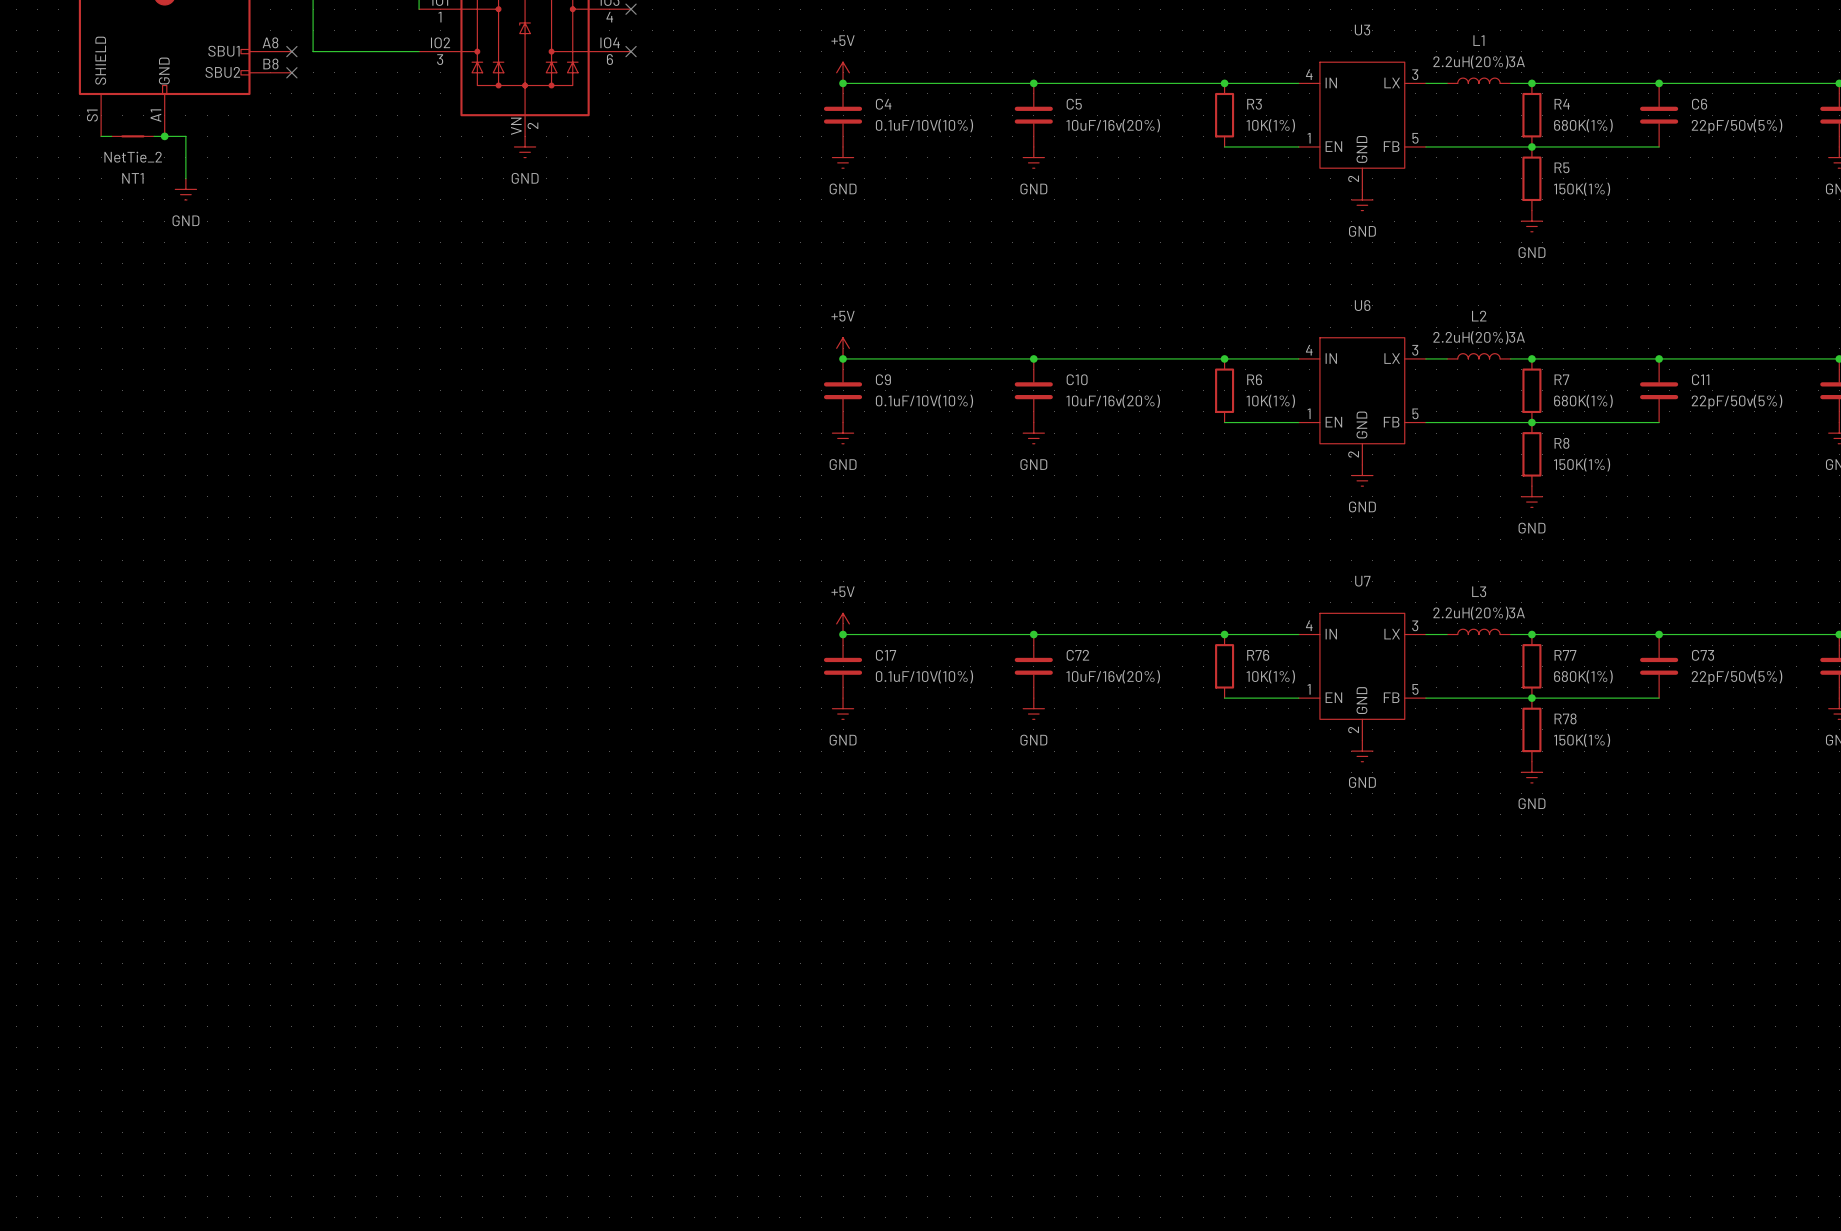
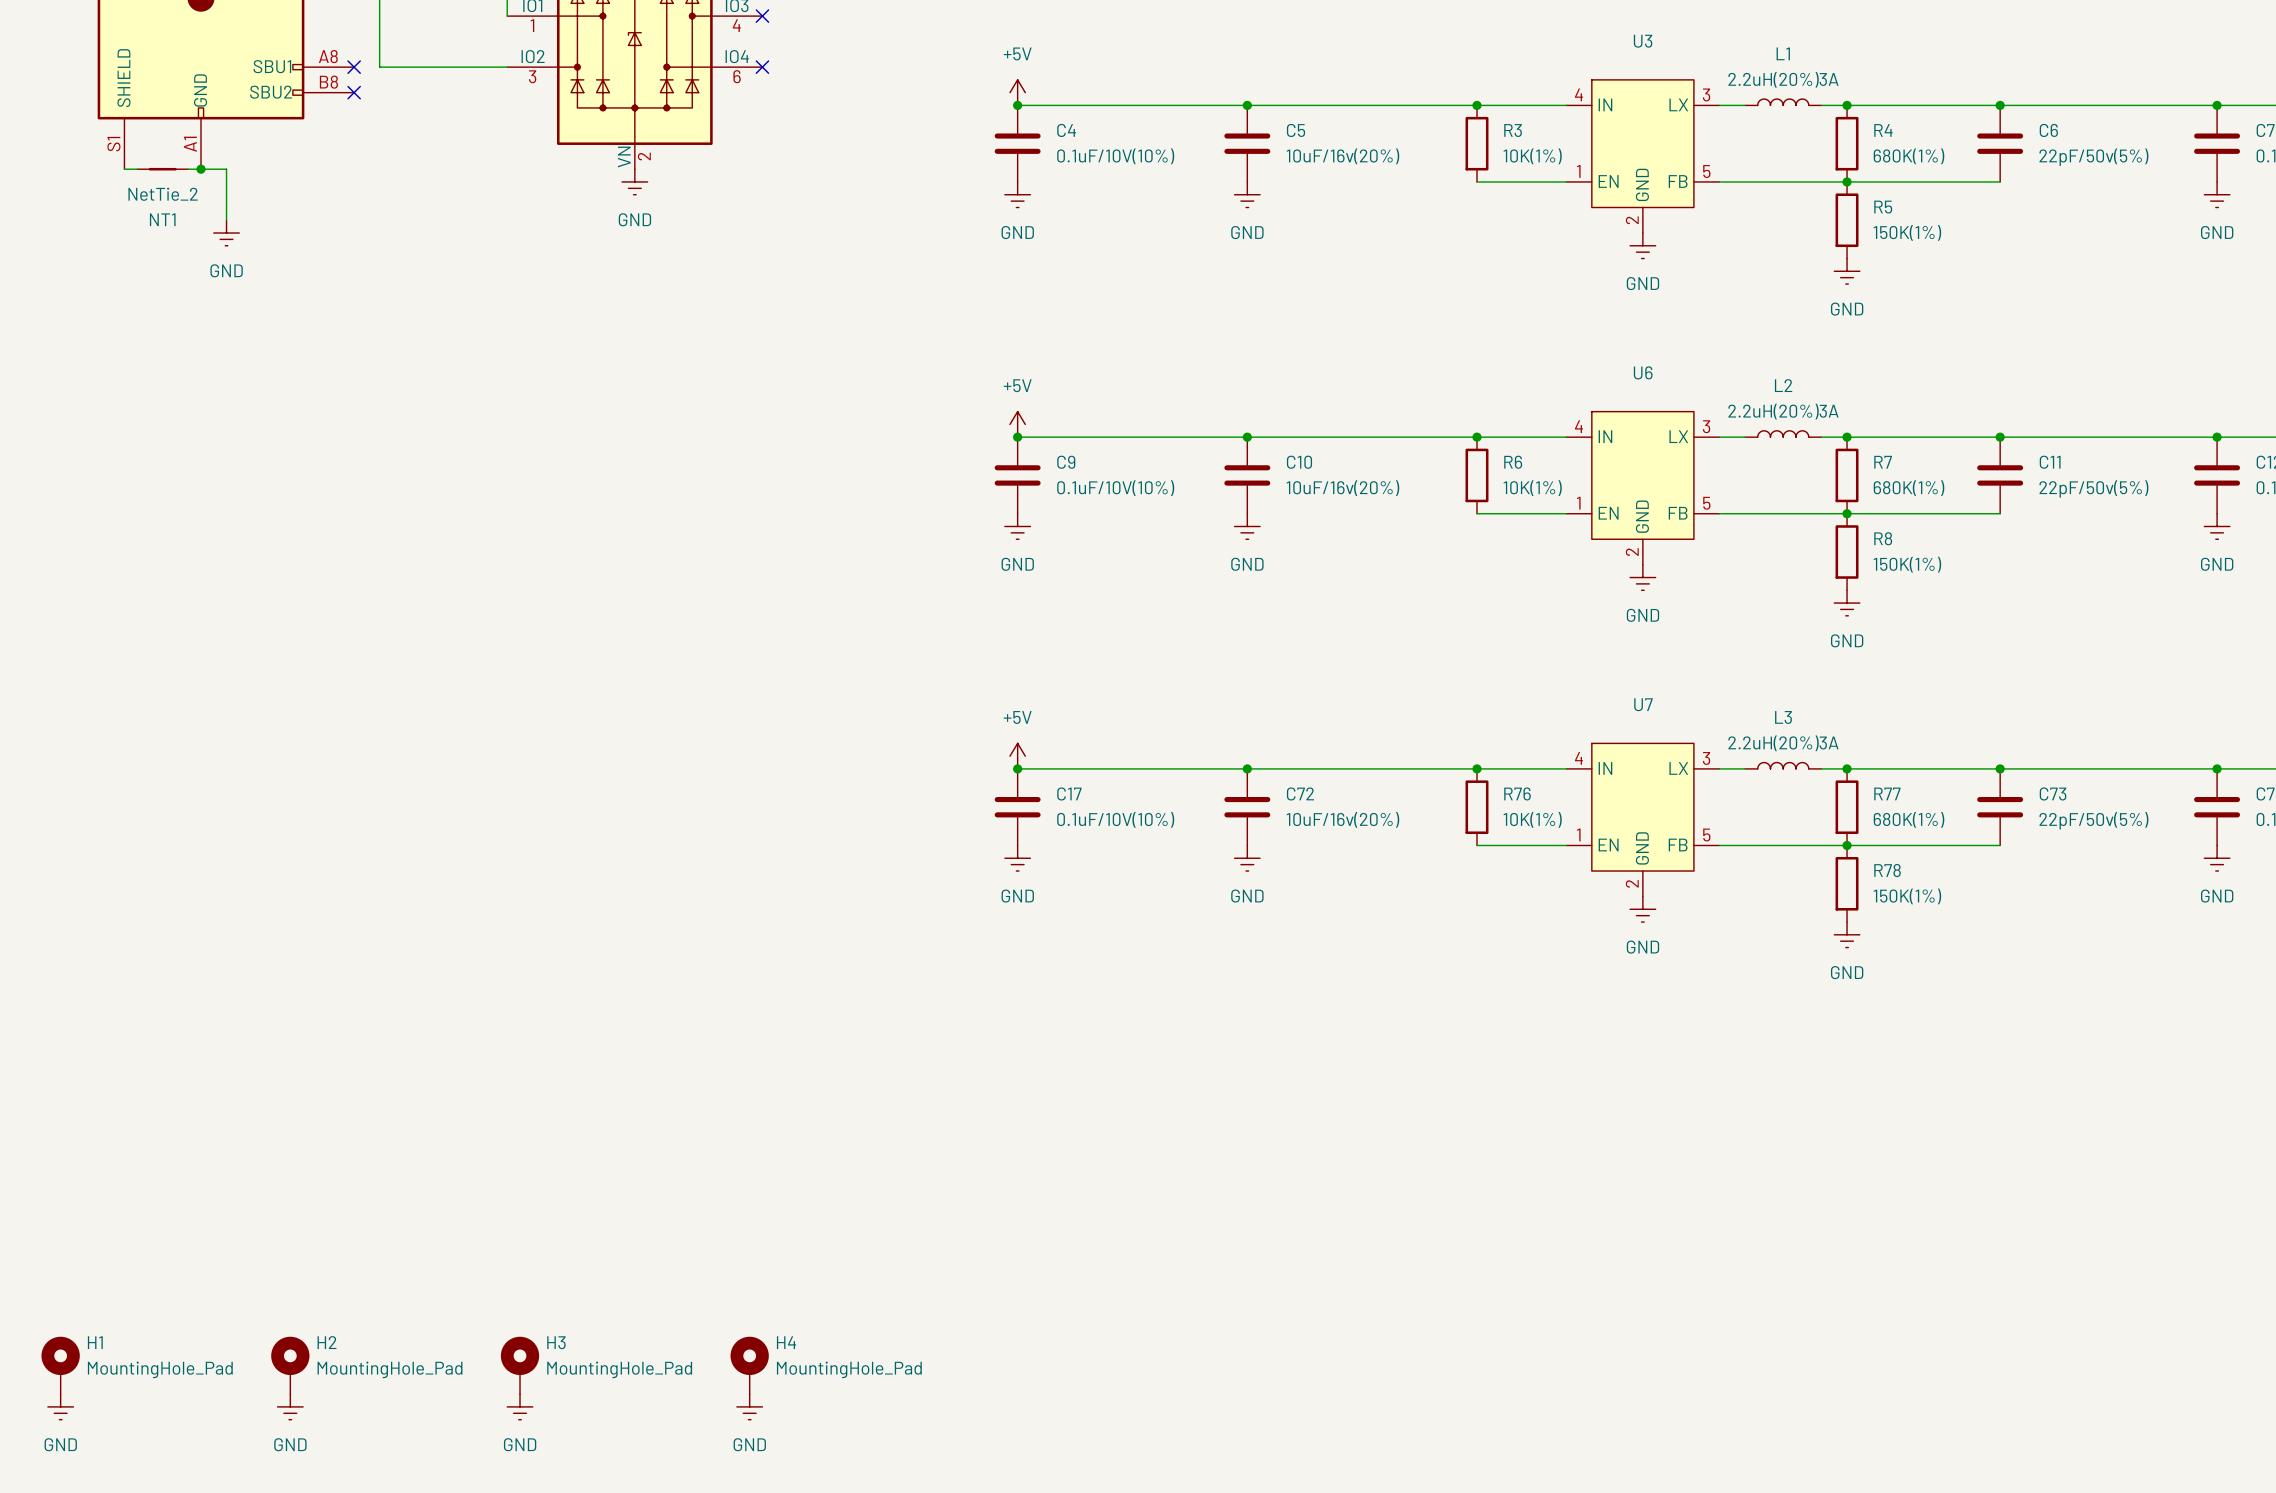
H1: none -> MountingHole_Pad (60, 1365)
H2: none -> MountingHole_Pad (290, 1365)
H3: none -> MountingHole_Pad (520, 1365)
H4: none -> MountingHole_Pad (749, 1365)
power symbol: none -> GND (60, 1406)
power symbol: none -> GND (290, 1406)
power symbol: none -> GND (520, 1406)
power symbol: none -> GND (749, 1406)

